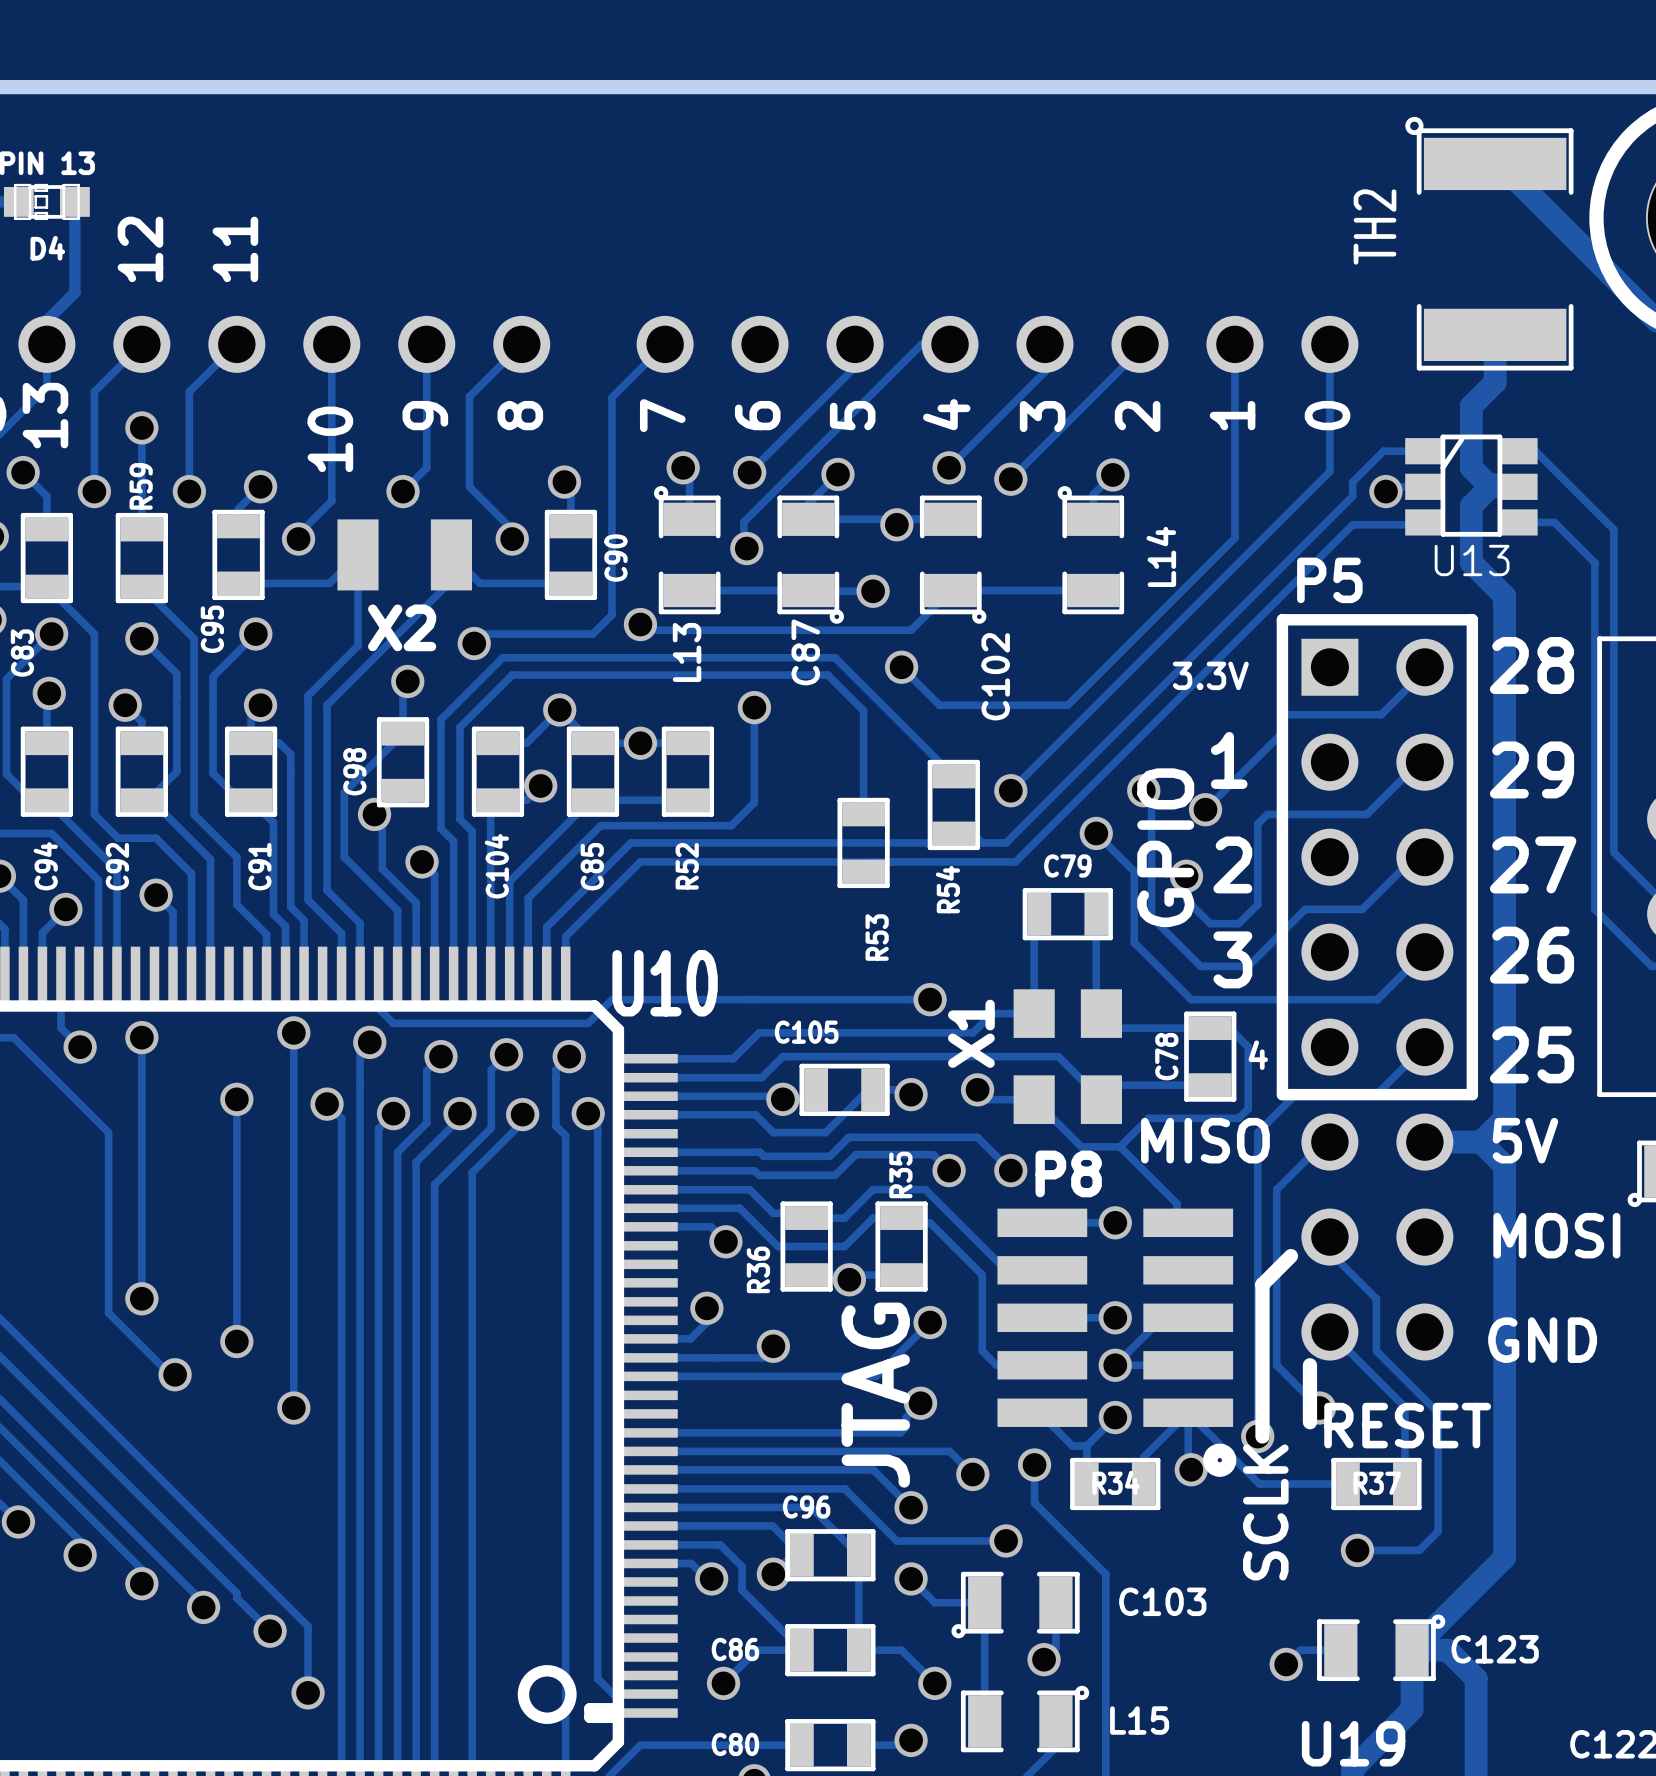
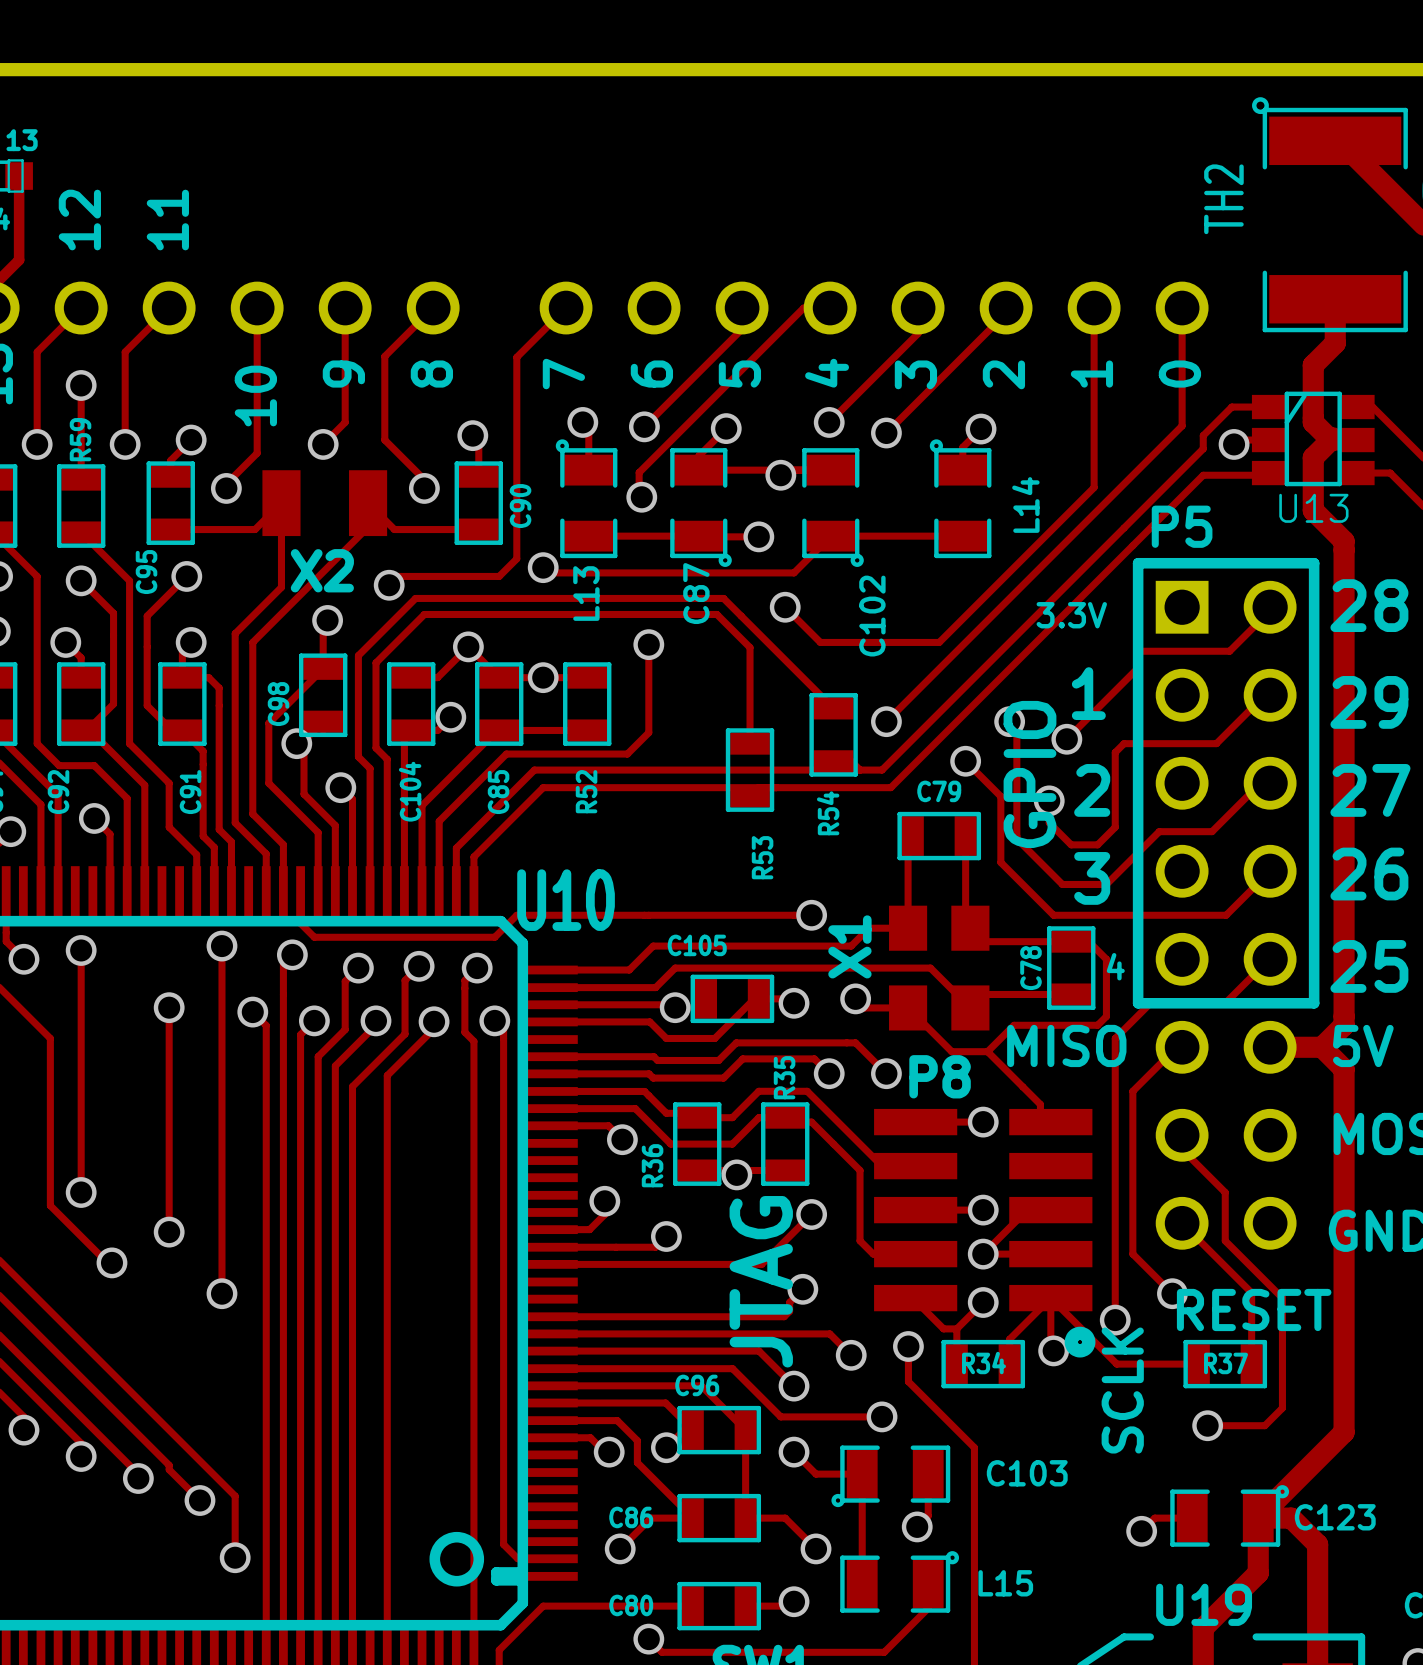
line: (1290, 1256) (1262, 1284) (1262, 1436) -> none
line: (1309, 1365) (1309, 1422) -> none

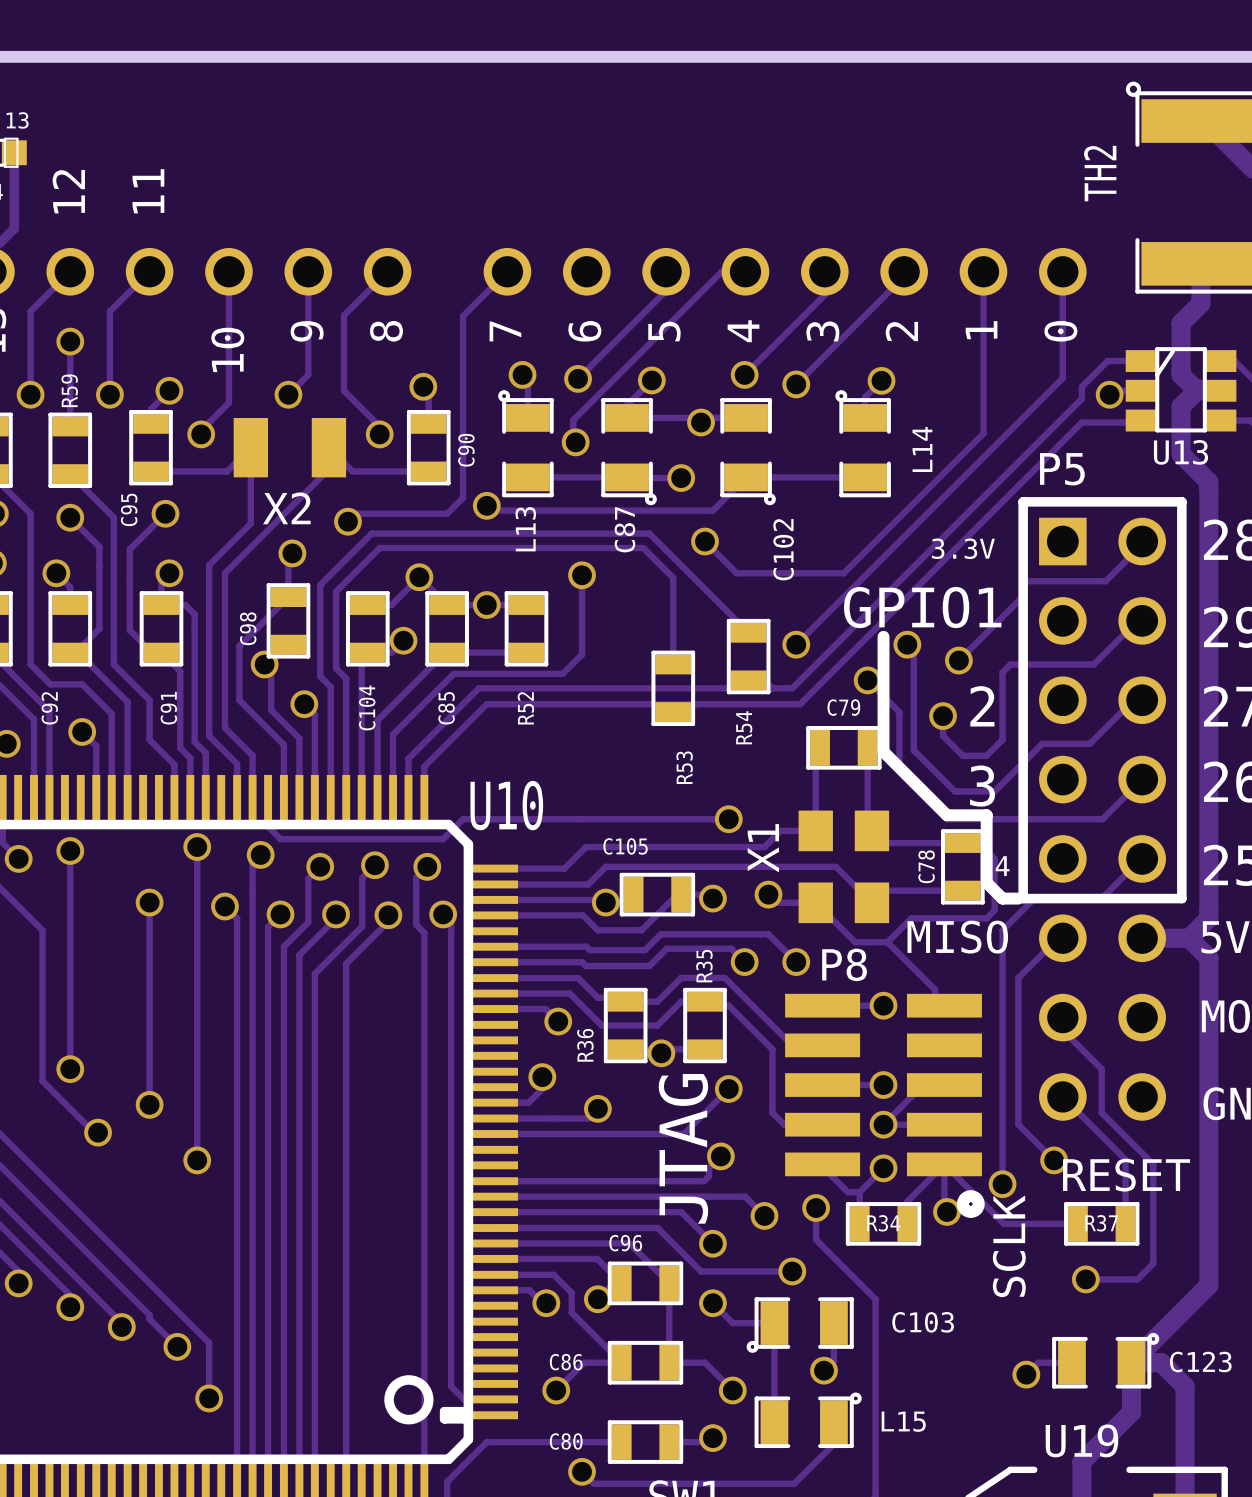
text: 1 (1088, 693) -> none
line: none -> (883, 636) (883, 751) (947, 815) (986, 815) (986, 882) (1002, 898) (1018, 898)
text: GPIO (1030, 774) -> GPIO1 (922, 607)

